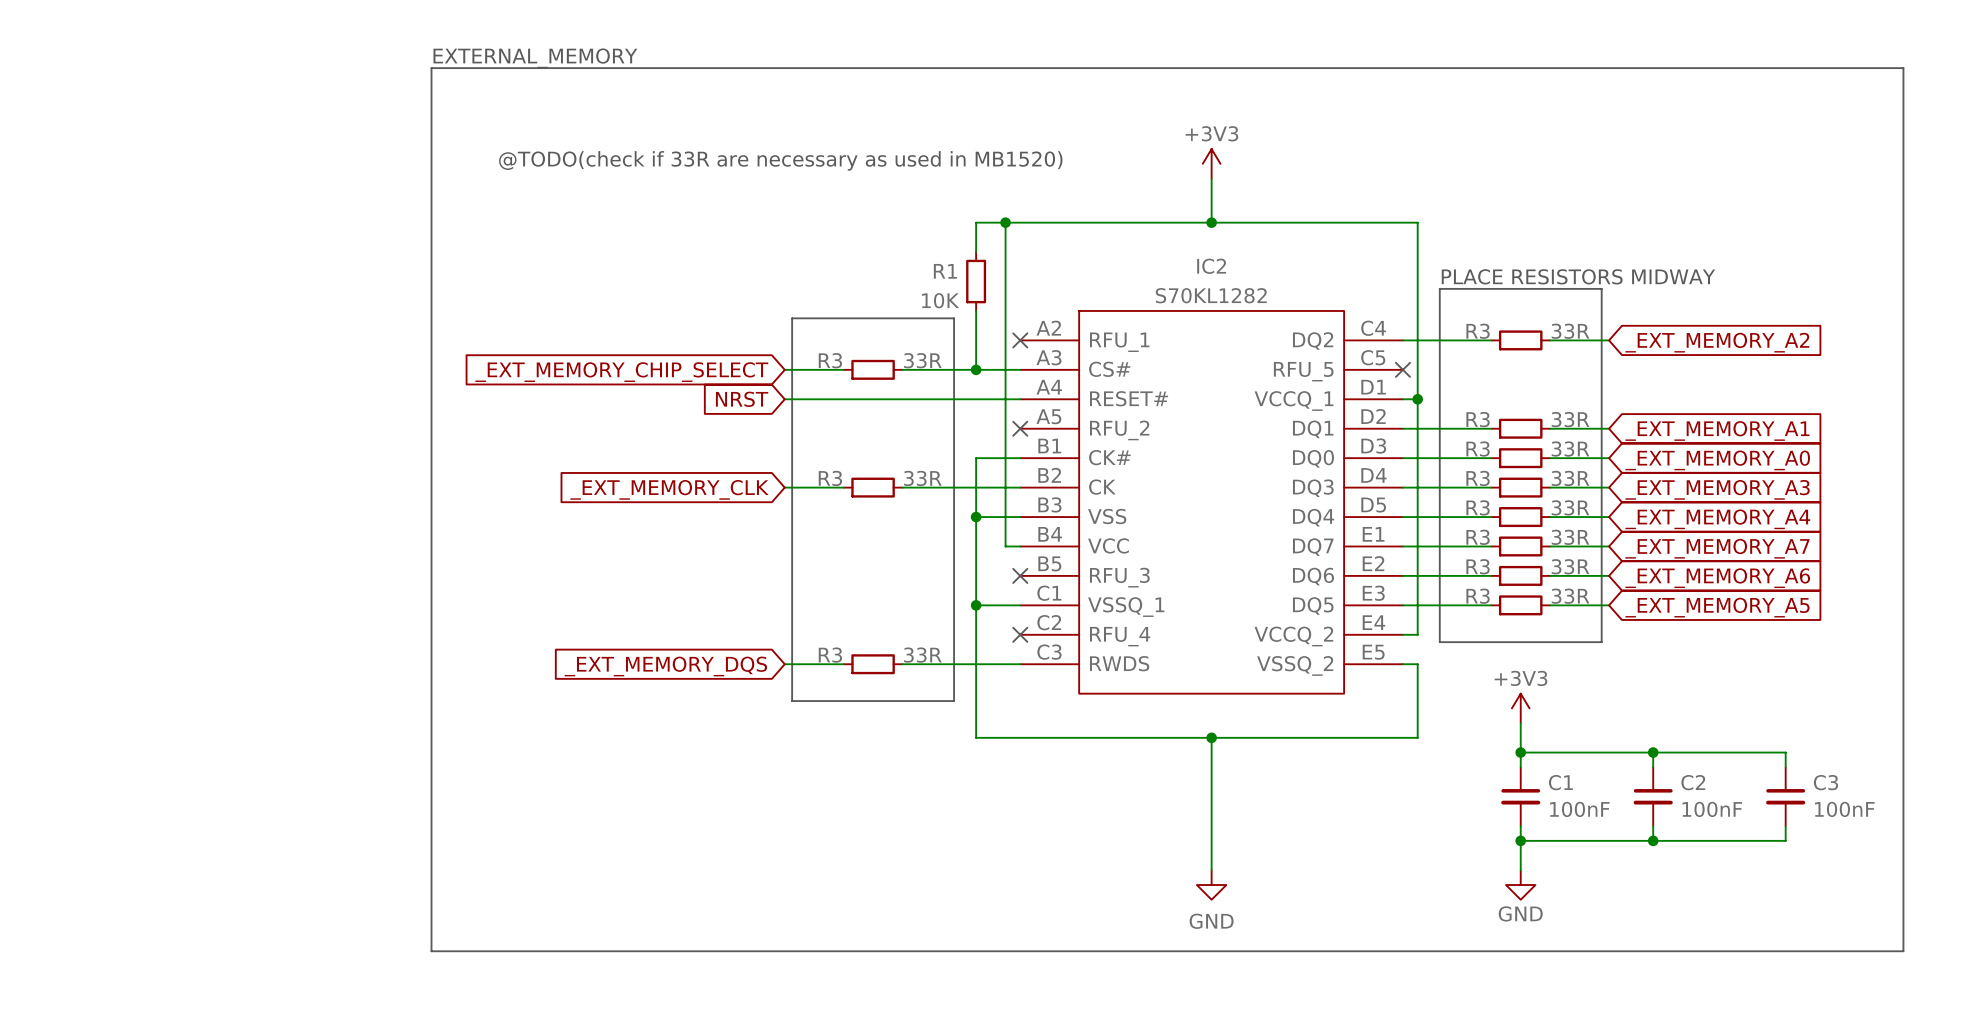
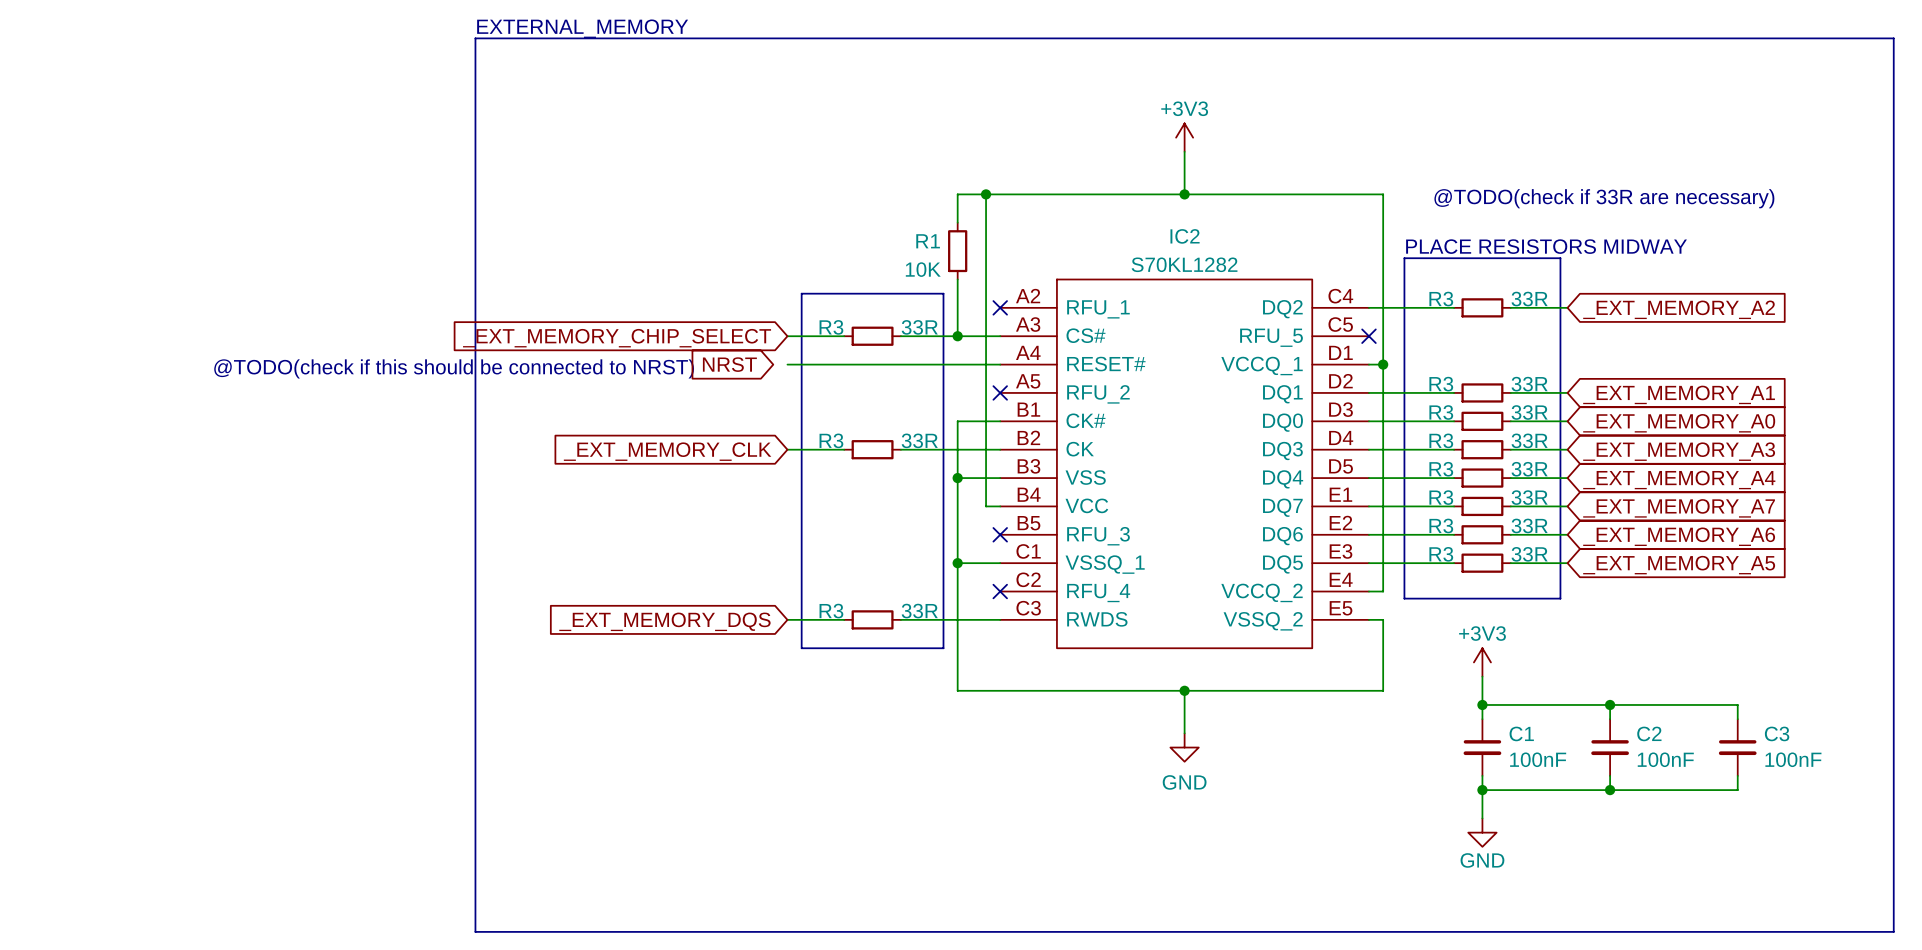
text position: EXTERNAL_MEMORY (535, 58) -> EXTERNAL_MEMORY (582, 28)
line: (431, 68) (1903, 68) (1903, 951) (431, 951) (431, 68) -> (475, 38) (475, 931) (1893, 931) (1893, 38) (475, 38)
text: @TODO(check if 33R are necessary as used in MB1520) (780, 160) -> none
text: none -> @TODO(check if 33R are necessary) (1604, 198)
line: (792, 318) (954, 318) (954, 701) (792, 701) (792, 318) -> (801, 293) (801, 648) (943, 648) (943, 293) (801, 293)
R3 position: (873, 369) -> (872, 336)
global label position: _EXT_MEMORY_CHIP_SELECT (621, 372) -> _EXT_MEMORY_CHIP_SELECT (617, 338)
wire: (784, 399) (799, 399) -> none
text: none -> @TODO(check if this should be connected to NRST) (454, 368)
R3 position: (873, 487) -> (872, 449)
global label position: _EXT_MEMORY_CLK (669, 489) -> _EXT_MEMORY_CLK (667, 451)
R3 position: (873, 664) -> (872, 619)
global label position: _EXT_MEMORY_DQS (665, 666) -> _EXT_MEMORY_DQS (664, 621)
wire: (1211, 781) (1211, 870) -> none
power symbol position: GND (1211, 885) -> GND (1184, 747)

